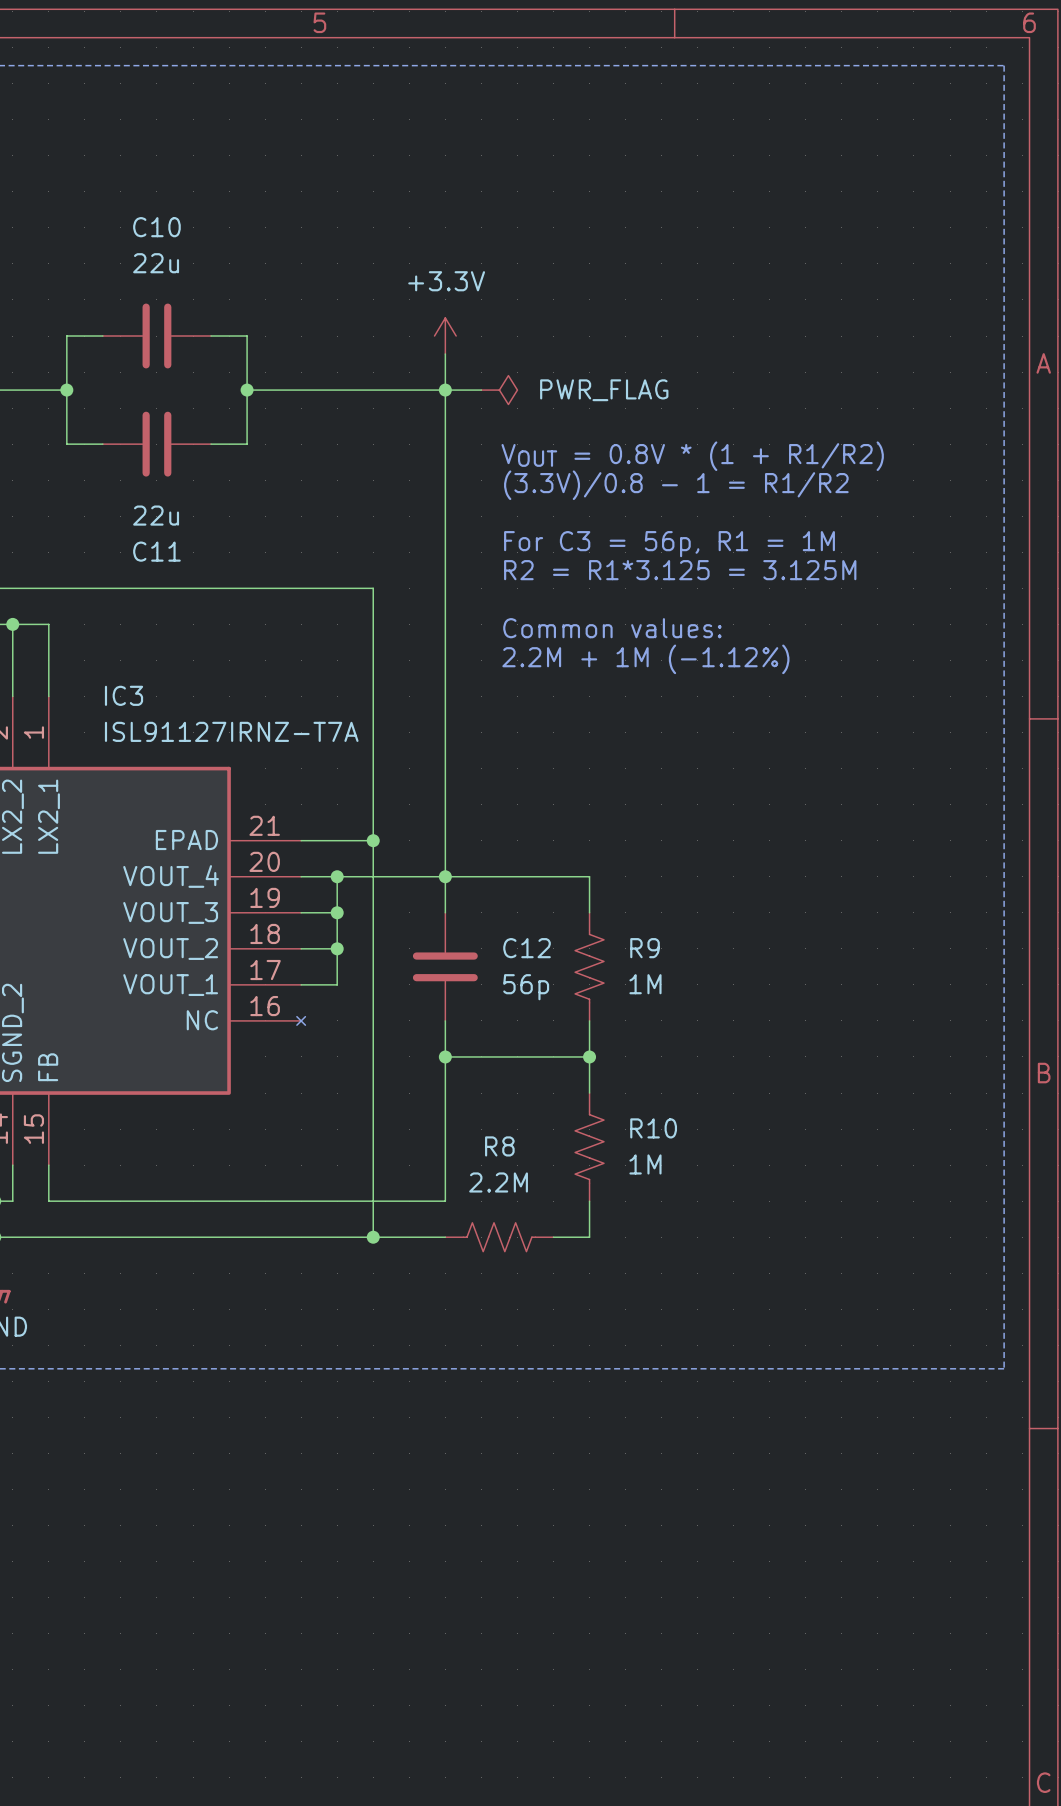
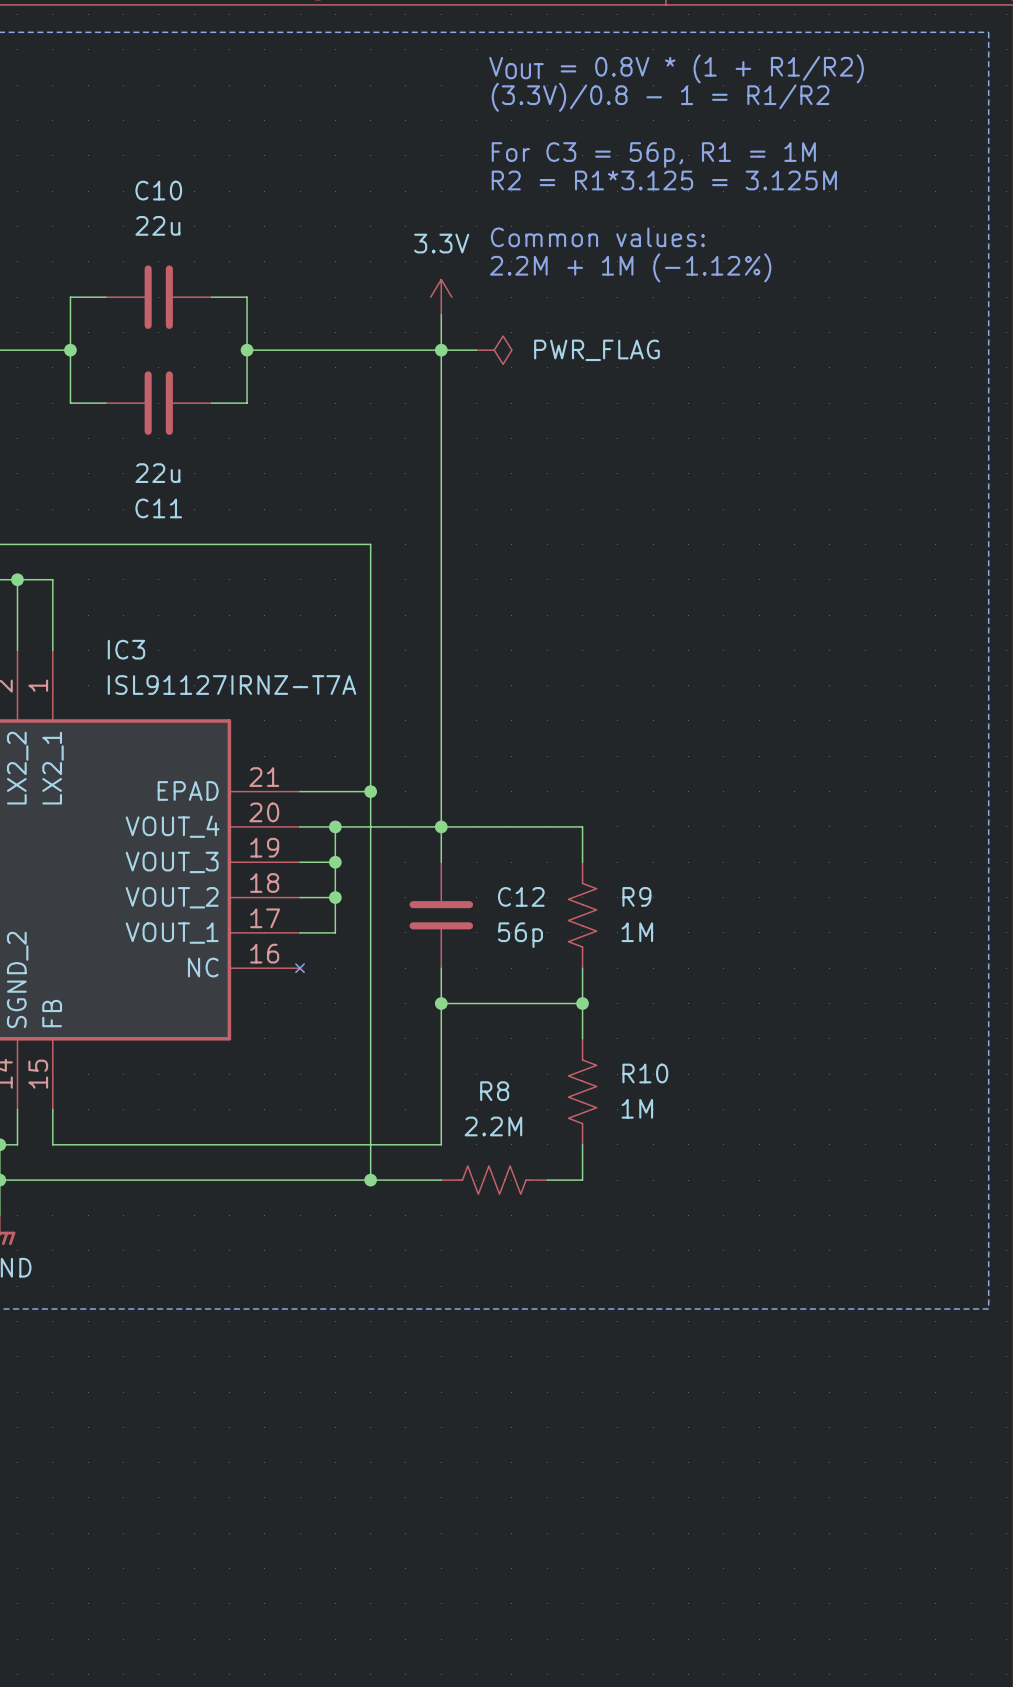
power symbol: +3.3V (445, 336) -> 3.3V (441, 297)
text position: VOUT = 0.8V * (1 + R1/R2) (692, 456) -> VOUT = 0.8V * (1 + R1/R2) (676, 68)
text position: (3.3V)/0.8 - 1 = R1/R2 (676, 485) -> (3.3V)/0.8 - 1 = R1/R2 (660, 97)
text position: For C3 = 56p, R1 = 1M (669, 544) -> For C3 = 56p, R1 = 1M (653, 154)
text position: R2 = R1*3.125 = 3.125M (680, 570) -> R2 = R1*3.125 = 3.125M (664, 180)
text position: Common values: (612, 628) -> Common values: (597, 237)
text position: 2.2M + 1M (-1.12%) (645, 659) -> 2.2M + 1M (-1.12%) (630, 267)

